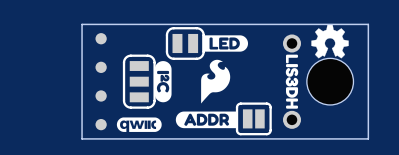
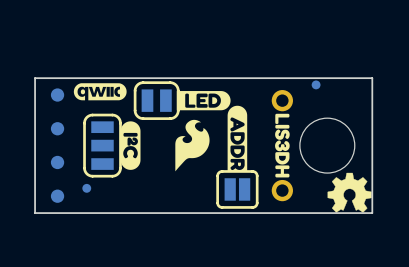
part: none -> (316, 84)
drawing position: (330, 41) -> (349, 192)
drawing: none -> [227, 105, 248, 172]
drawing: [175, 111, 237, 129] -> none
part: none -> (86, 188)
drawing position: (139, 124) -> (100, 91)

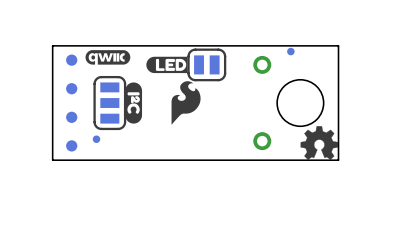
drawing: none -> [146, 56, 188, 74]
drawing: [176, 91, 248, 172] -> none
part position: (156, 100) -> (206, 64)
drawing: [275, 113, 290, 178] -> none
part: (237, 189) -> none

